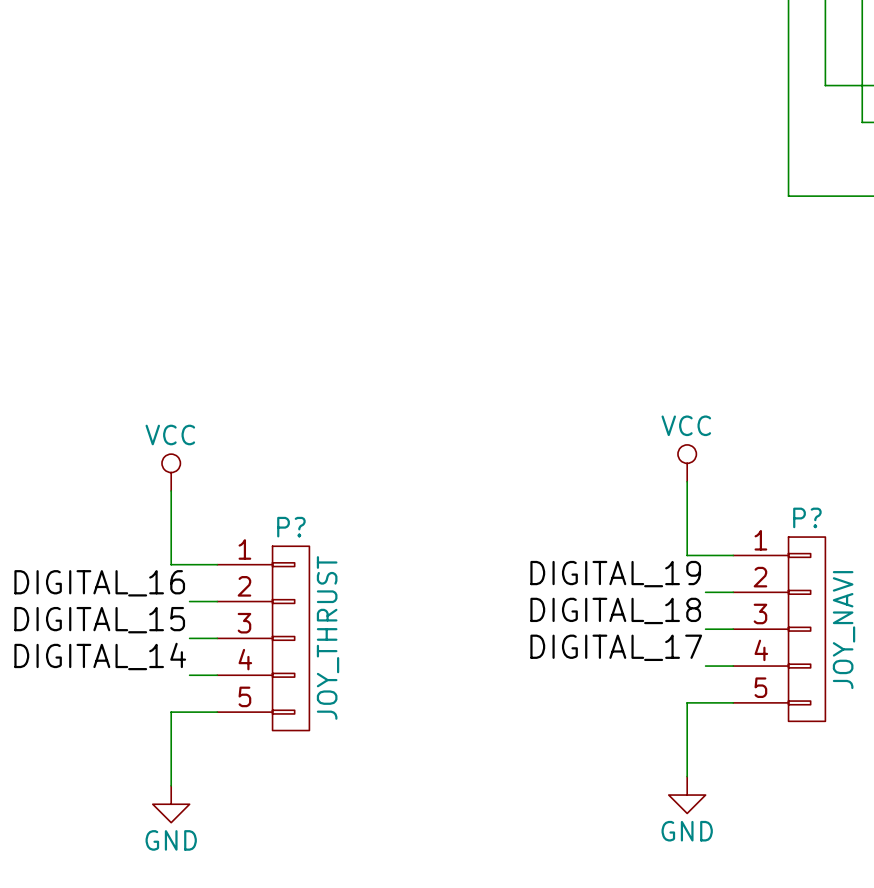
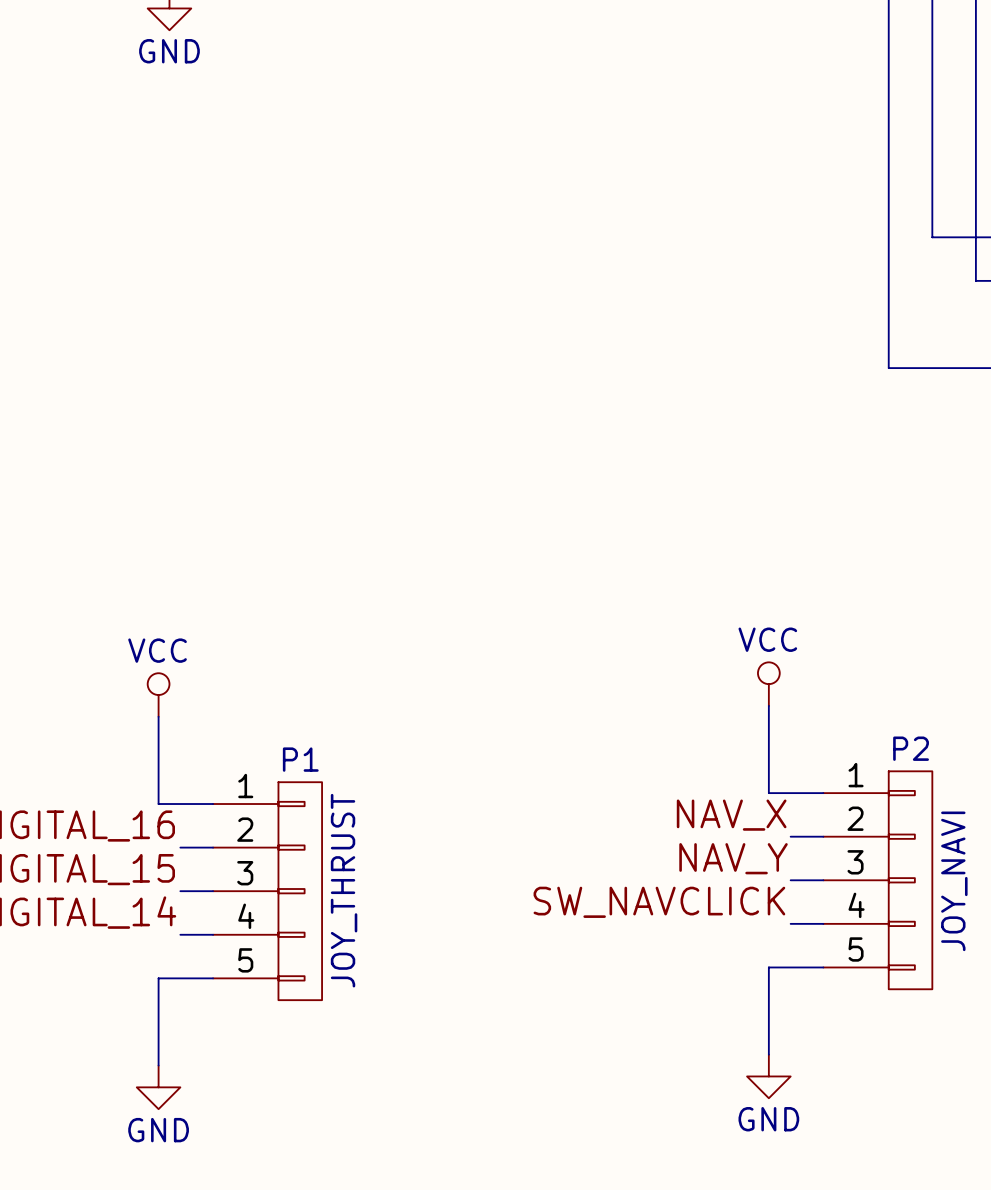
P? name: P? (807, 517) -> P2 (911, 748)
P? name: P? (291, 527) -> P1 (300, 759)
label: DIGITAL_19 (615, 574) -> NAV_X (731, 815)
label: DIGITAL_18 (615, 610) -> NAV_Y (733, 858)
label: DIGITAL_17 (616, 647) -> SW_NAVCLICK (659, 902)

